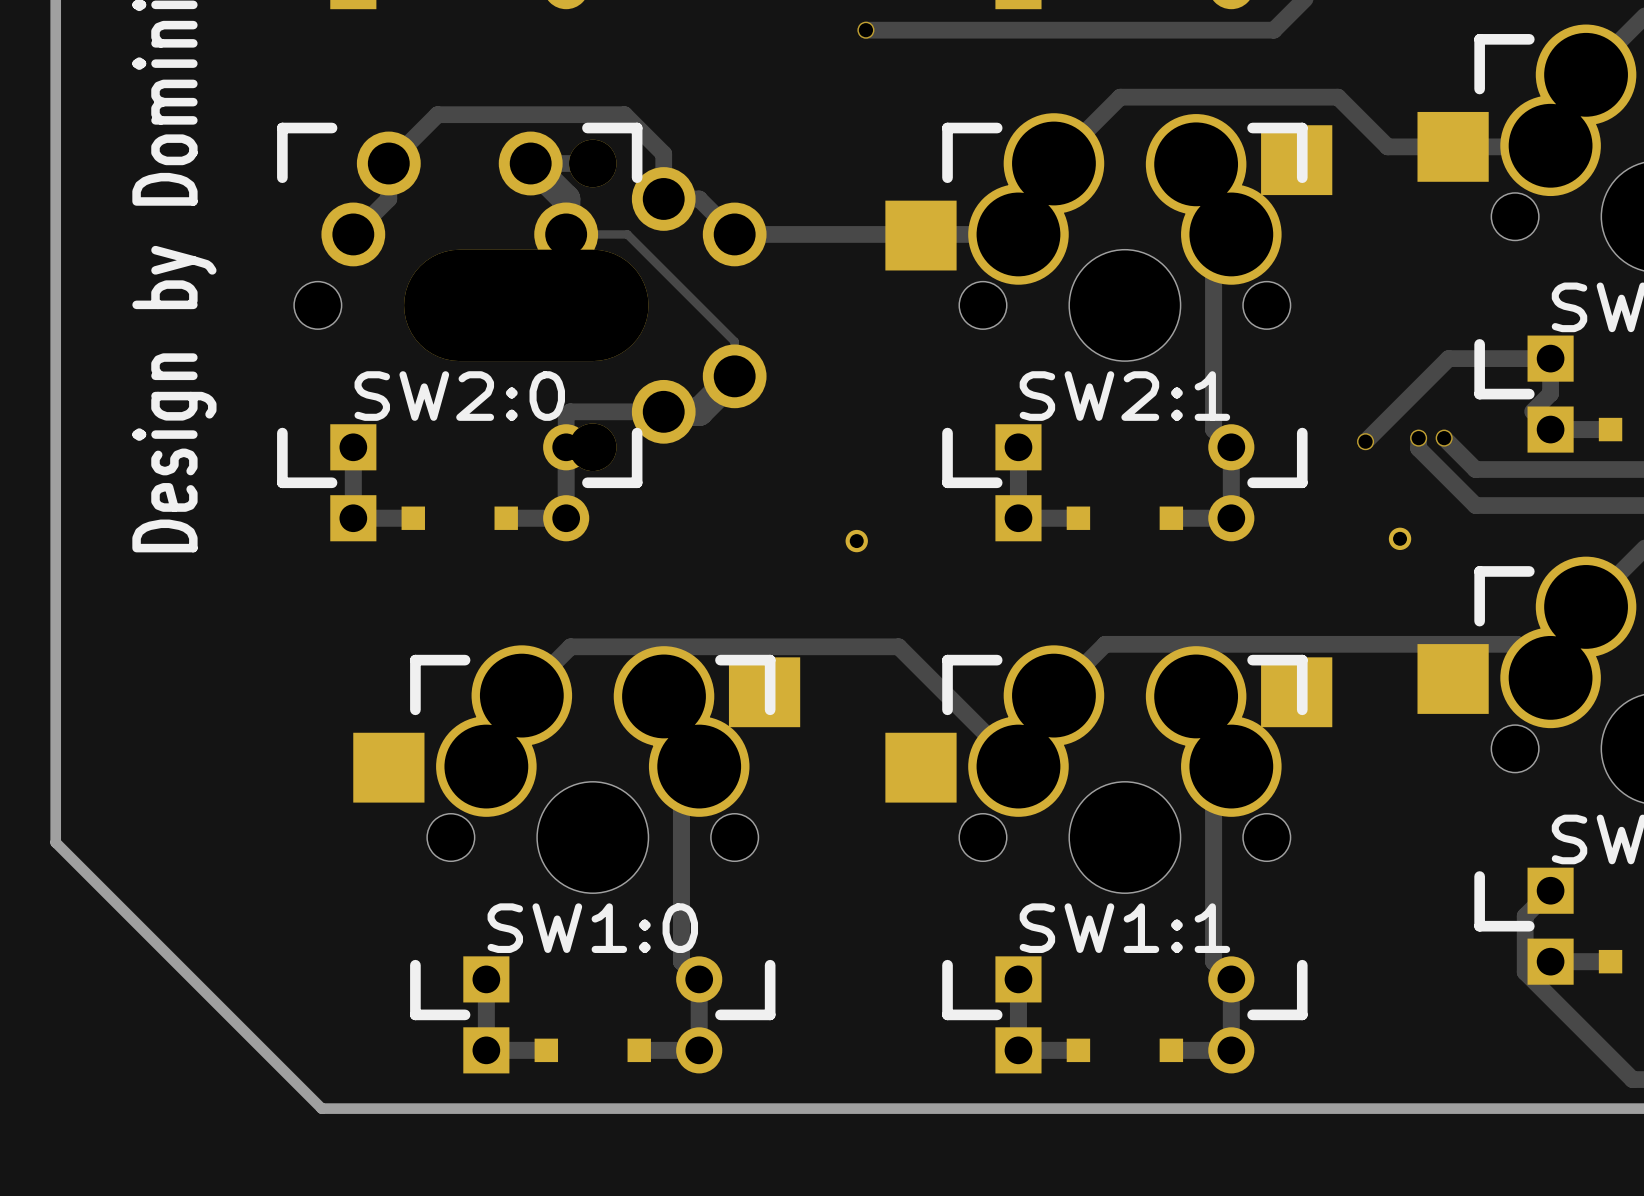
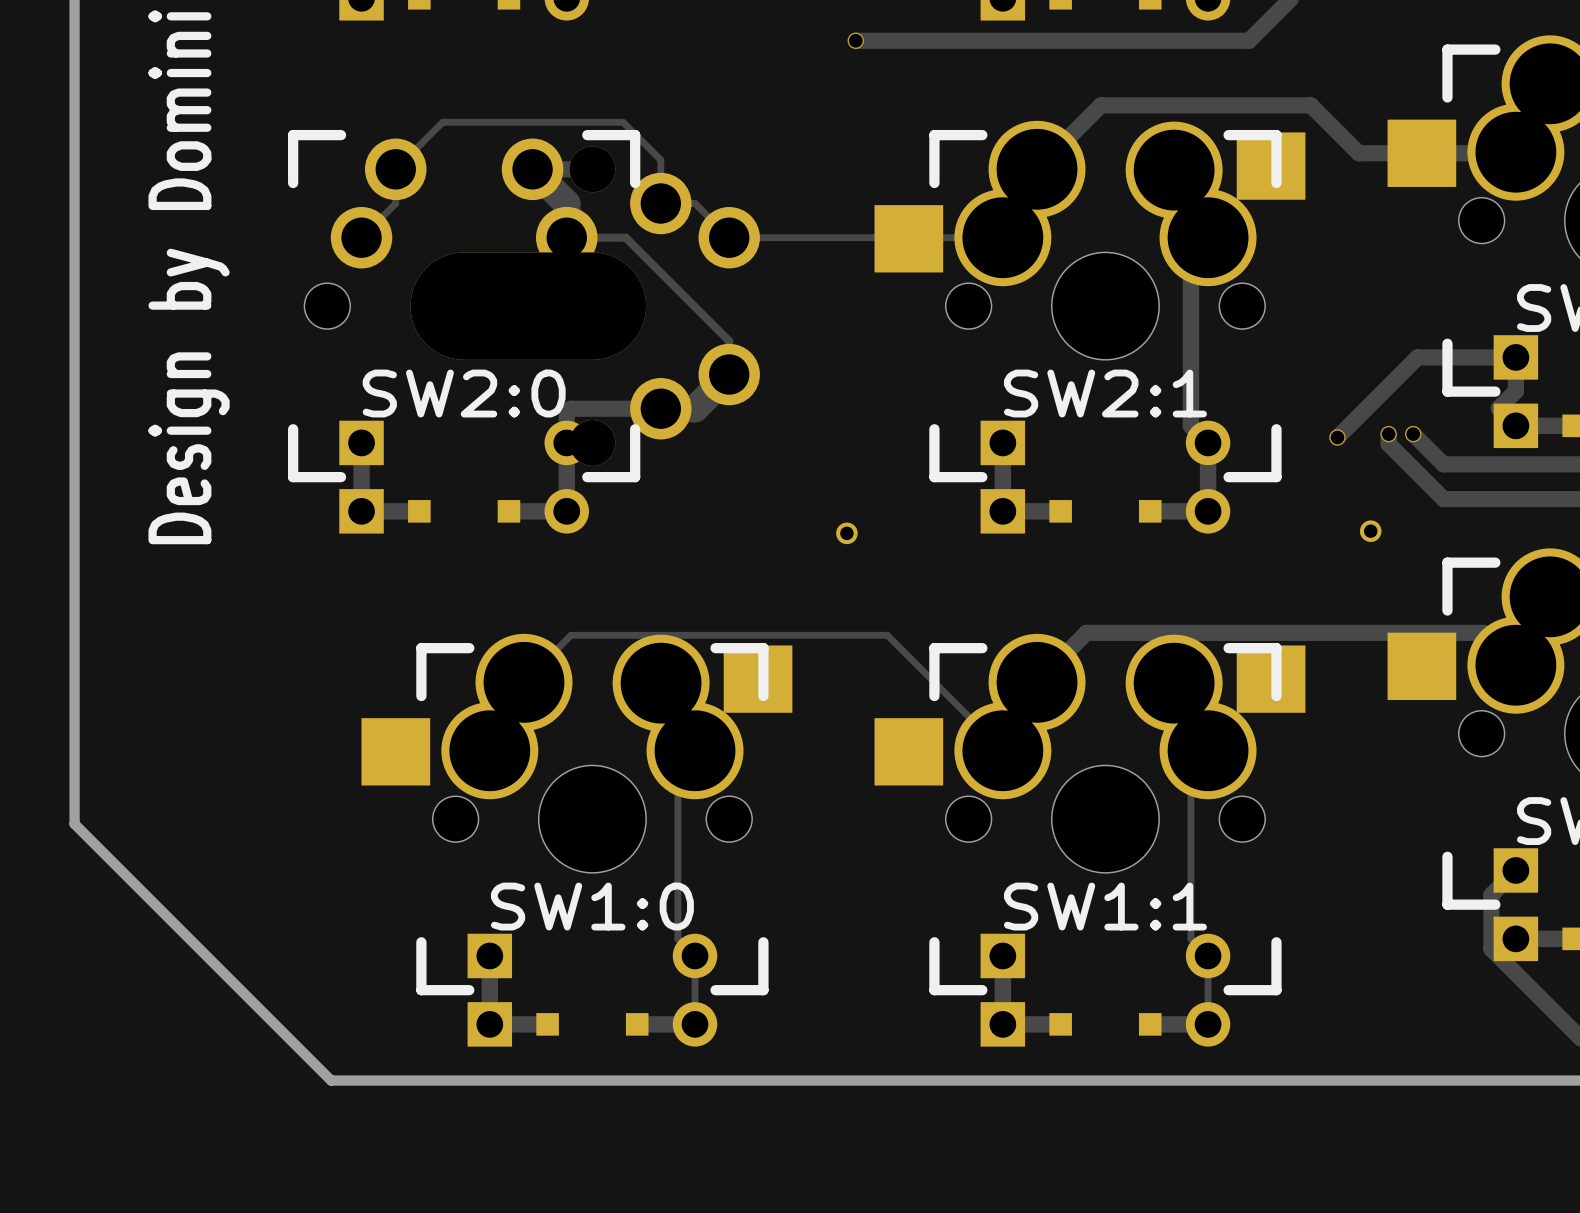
track width: thick (1053, 198) (1018, 234) (734, 234) (699, 198) (663, 198) (663, 153) (624, 114) (437, 114) (388, 163) (388, 198) (353, 234) -> thin (1037, 203) (1002, 237) (729, 237) (695, 203) (660, 203) (660, 160) (622, 122) (442, 122) (395, 169) (395, 203) (361, 237)
track width: thick (486, 731) (570, 646) (898, 646) (1018, 766) -> thin (489, 716) (571, 635) (887, 635) (1002, 750)
track width: thick (681, 784) (681, 961) (699, 979) (699, 1050) -> thin (677, 767) (677, 938) (695, 955) (695, 1024)
track width: thick (1213, 784) (1213, 961) (1231, 979) (1231, 1050) -> thin (1190, 767) (1190, 938) (1208, 955) (1208, 1024)

